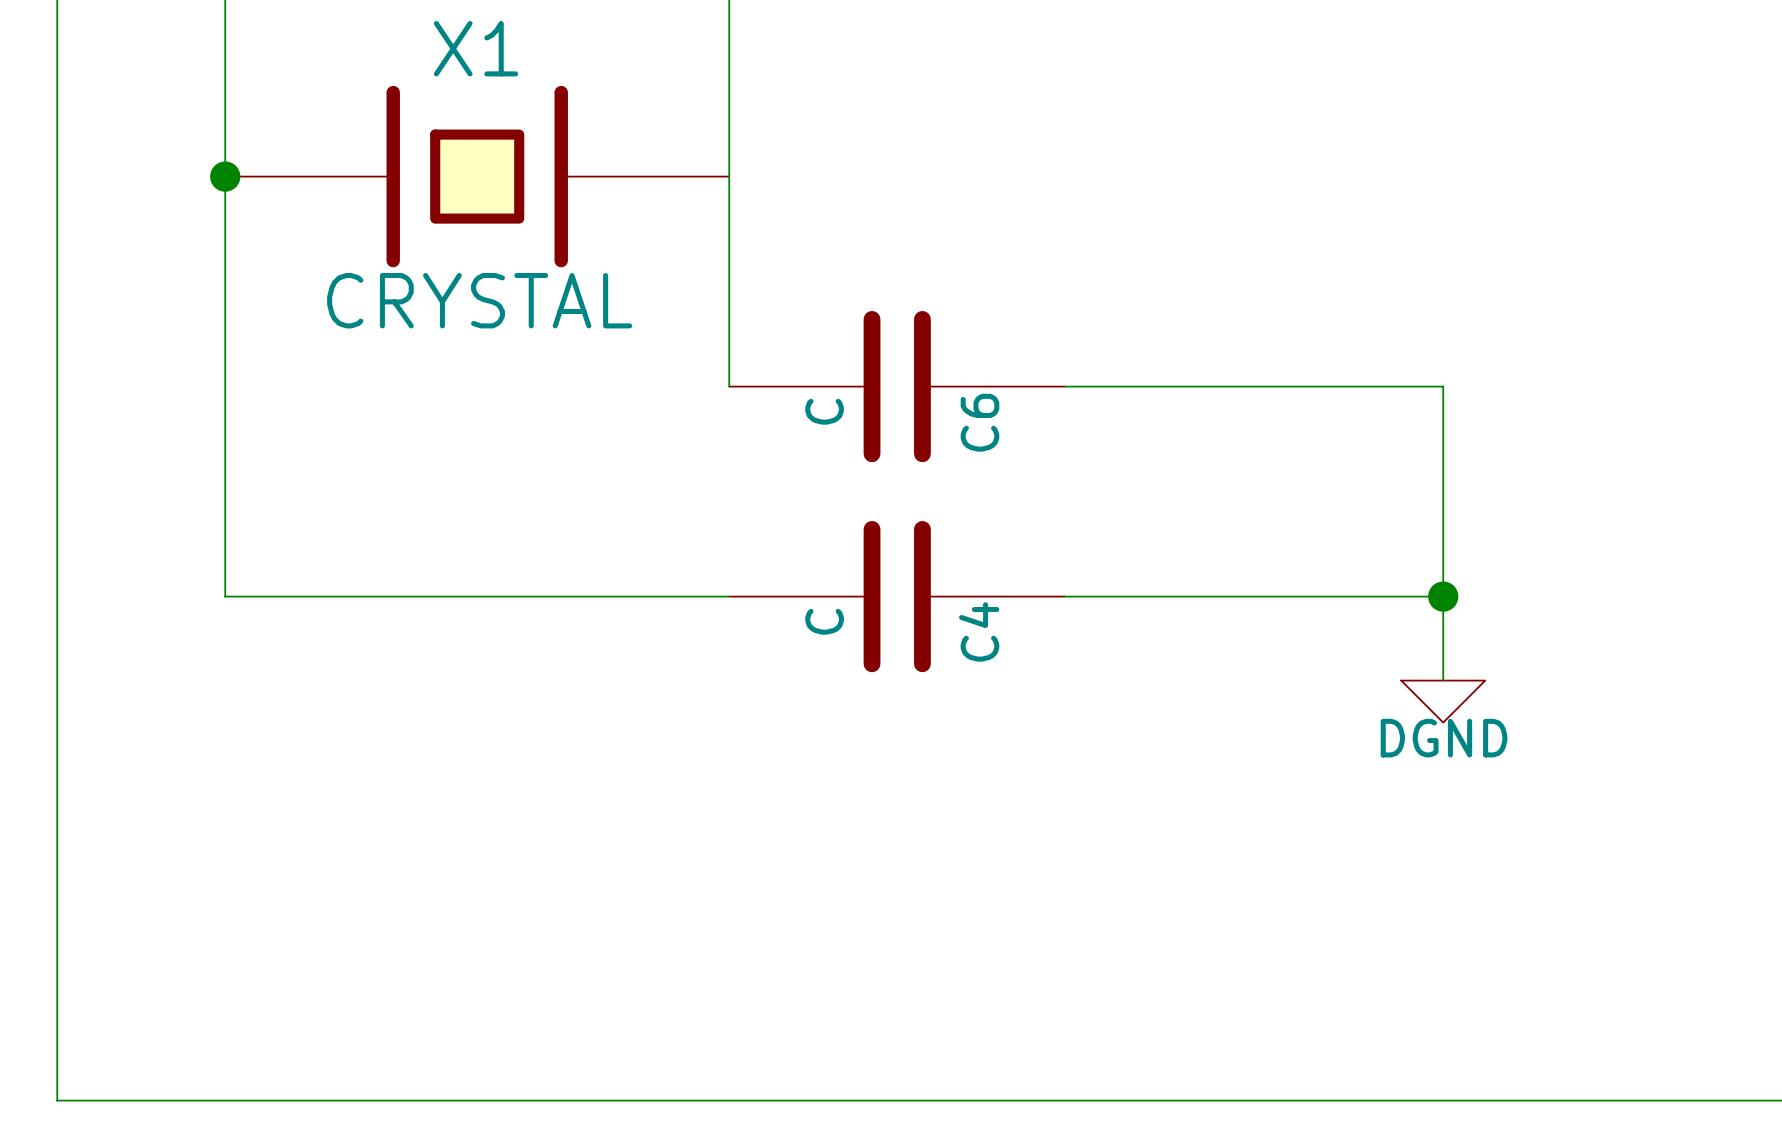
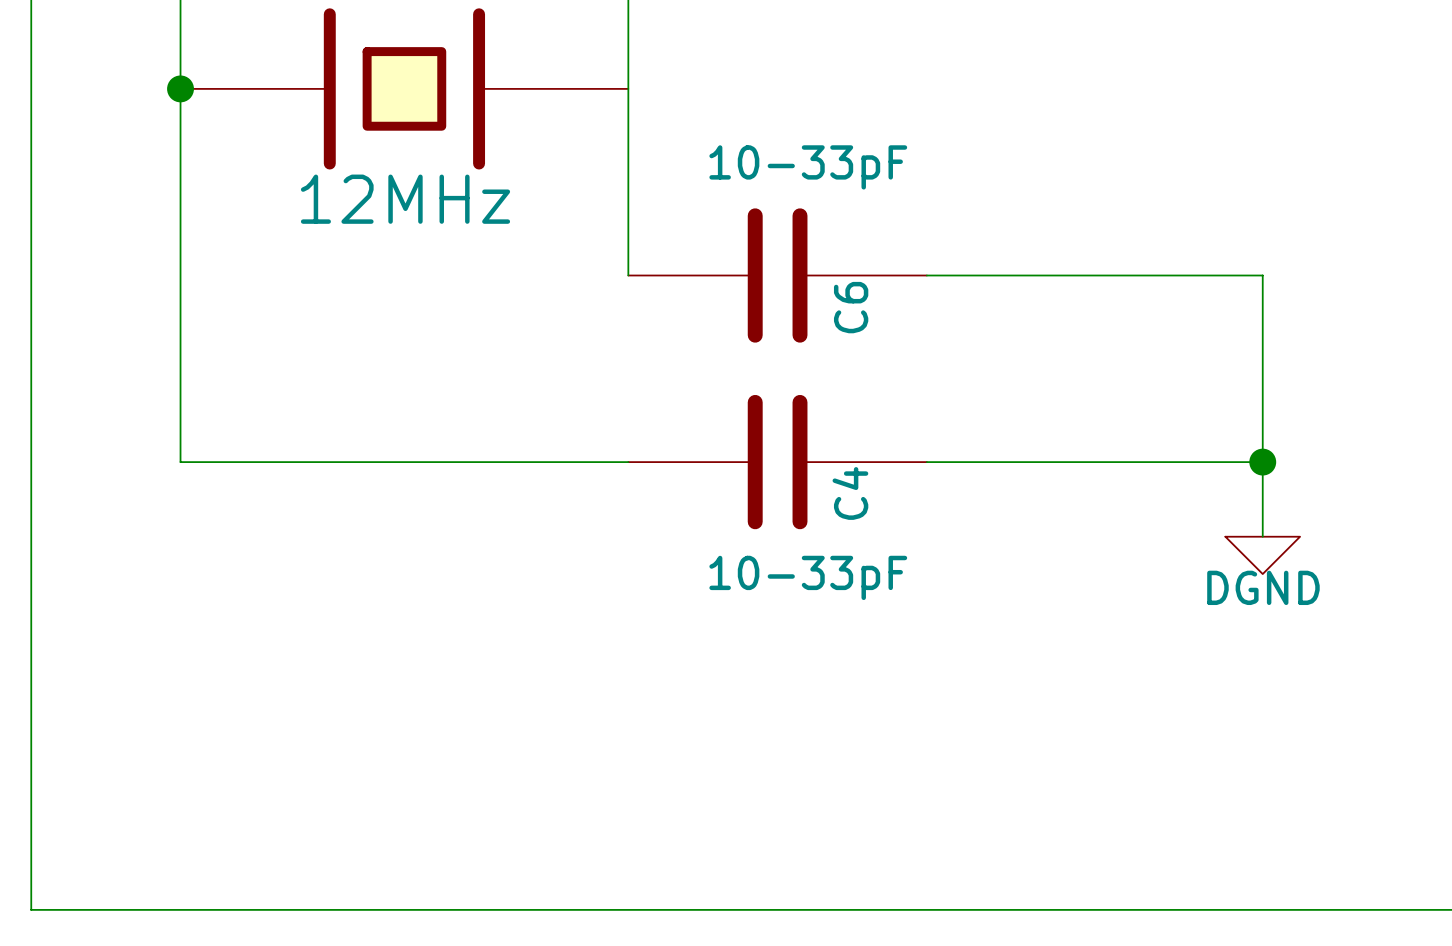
X1 value: CRYSTAL (479, 300) -> 12MHz (405, 199)
C6 value: C (824, 411) -> 10-33pF (808, 167)
C4 value: C (824, 621) -> 10-33pF (808, 577)

